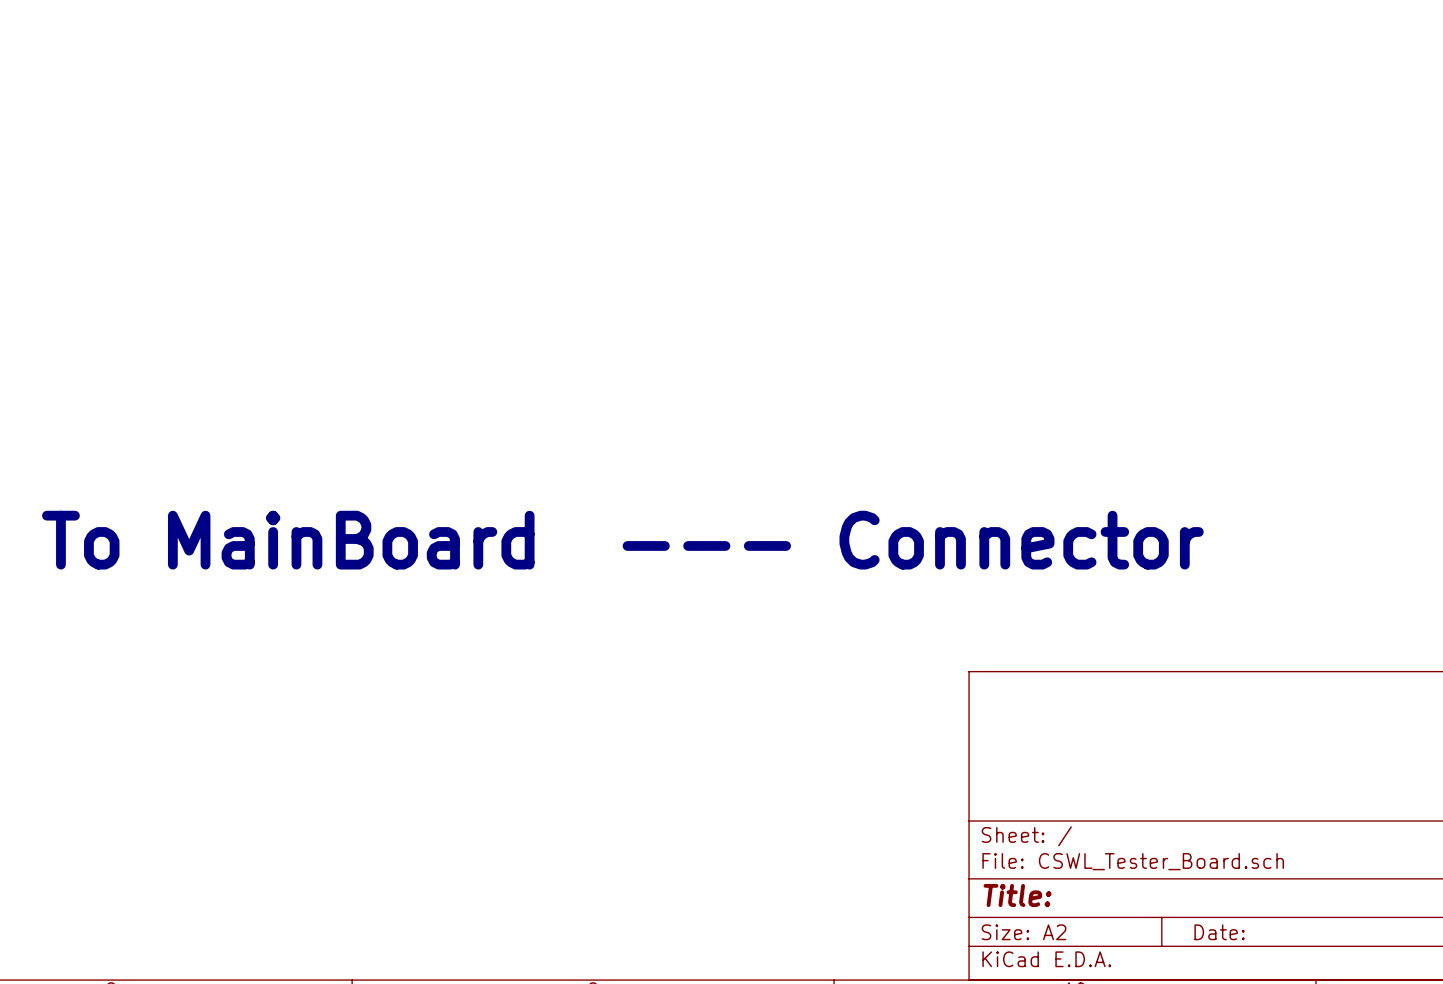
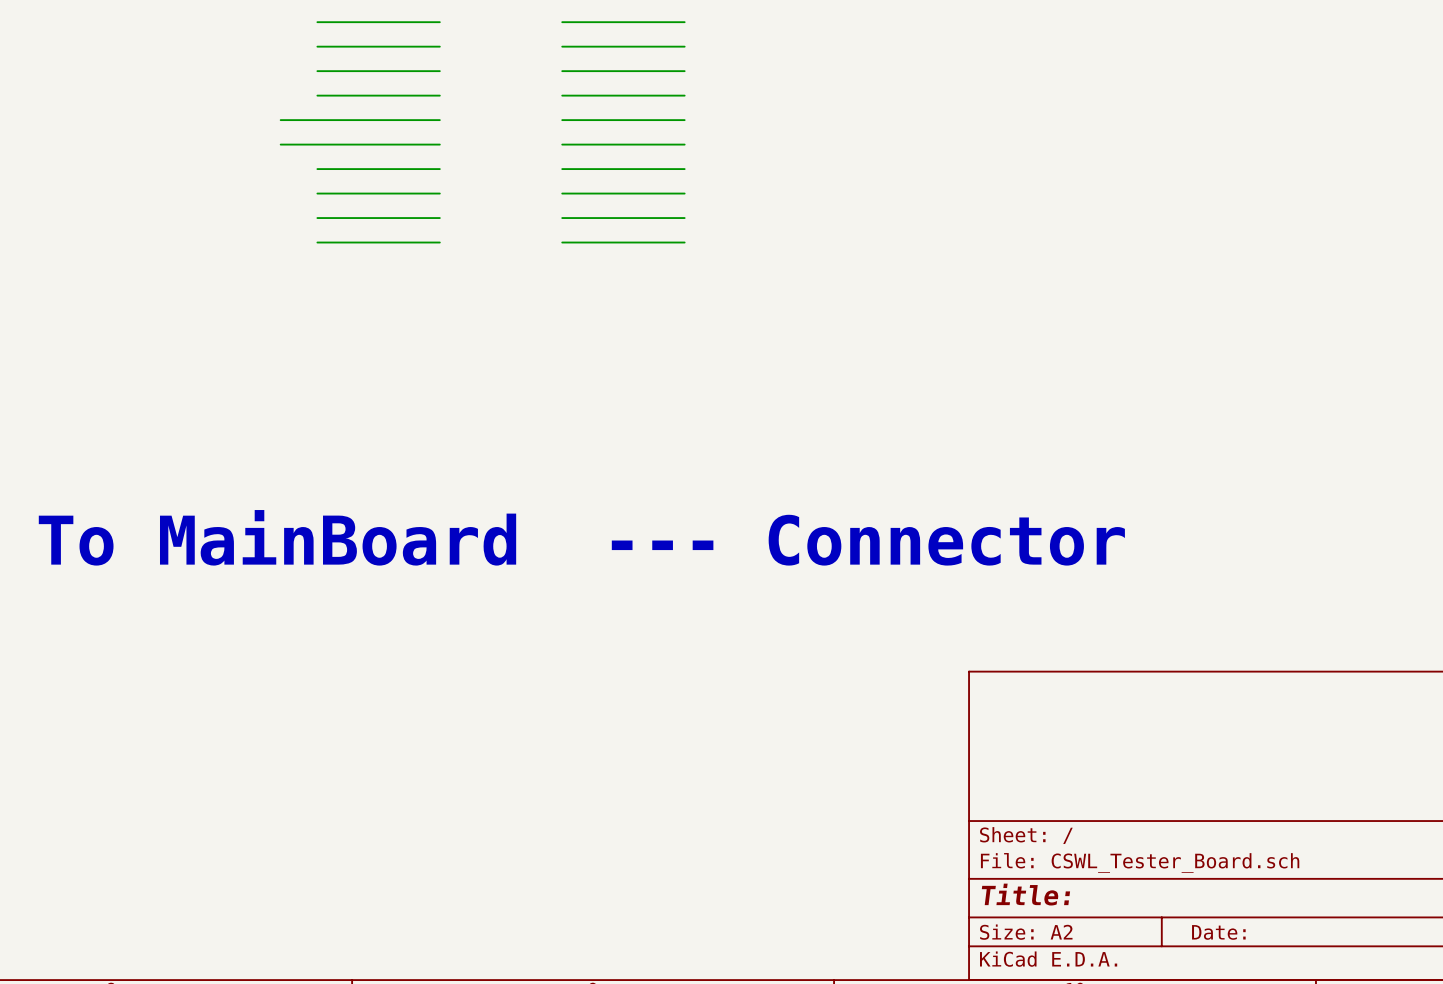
wire: none -> (317, 22) (439, 22)
wire: none -> (562, 22) (684, 22)
wire: none -> (317, 46) (439, 46)
wire: none -> (562, 46) (684, 46)
wire: none -> (317, 71) (439, 71)
wire: none -> (562, 71) (684, 71)
wire: none -> (317, 95) (439, 95)
wire: none -> (562, 95) (684, 95)
wire: none -> (280, 120) (439, 120)
wire: none -> (562, 120) (684, 120)
wire: none -> (280, 144) (439, 144)
wire: none -> (562, 144) (684, 144)
wire: none -> (317, 169) (439, 169)
wire: none -> (562, 169) (684, 169)
wire: none -> (317, 193) (439, 193)
wire: none -> (562, 193) (684, 193)
wire: none -> (317, 218) (439, 218)
wire: none -> (562, 218) (684, 218)
wire: none -> (317, 242) (439, 242)
wire: none -> (562, 242) (684, 242)

